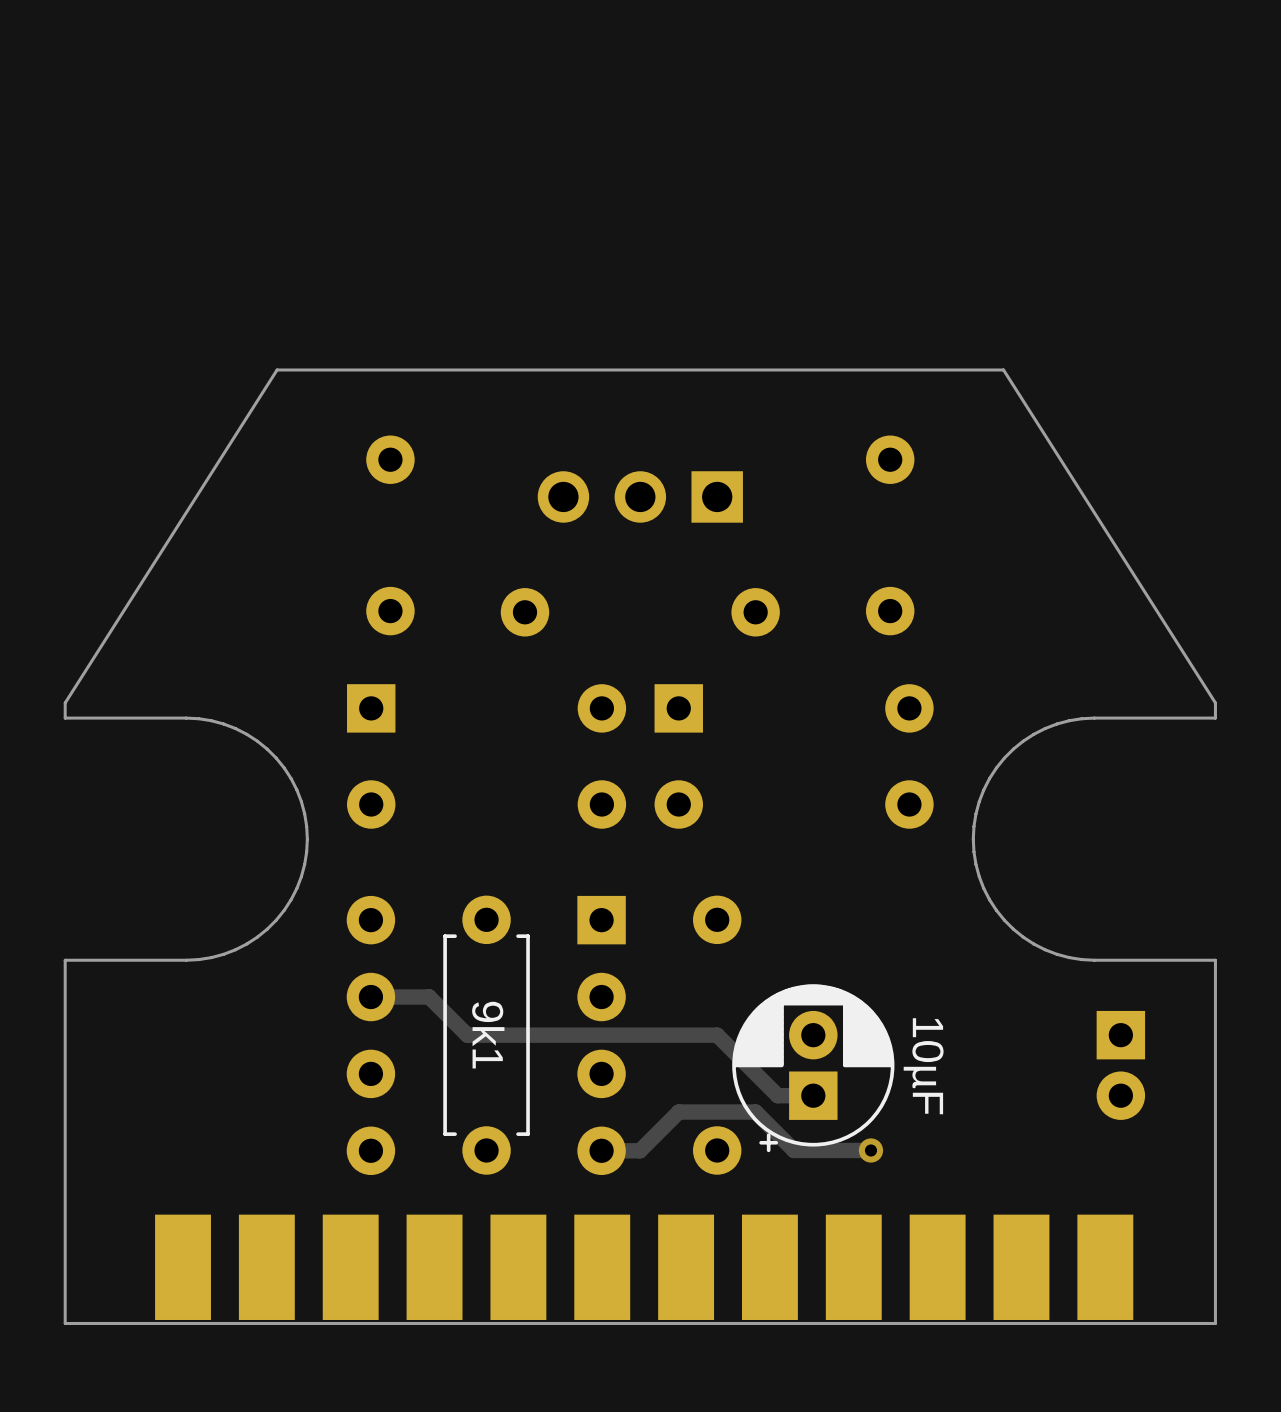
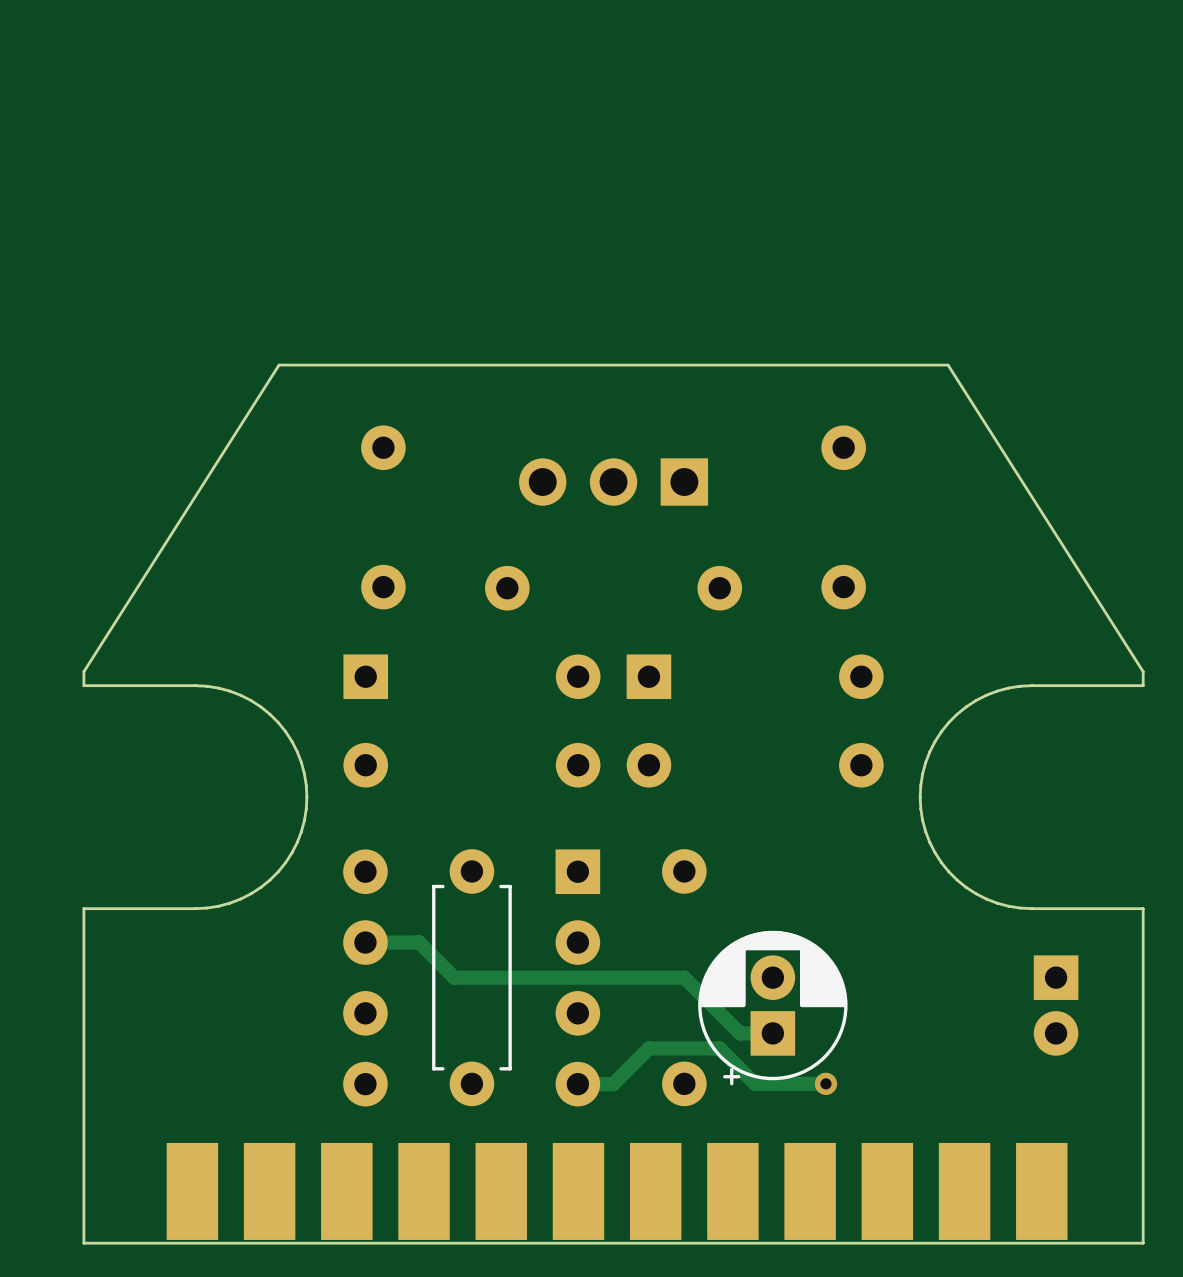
part value: 9k1 (488, 1035) -> none
part value: 10µF (923, 1066) -> none

